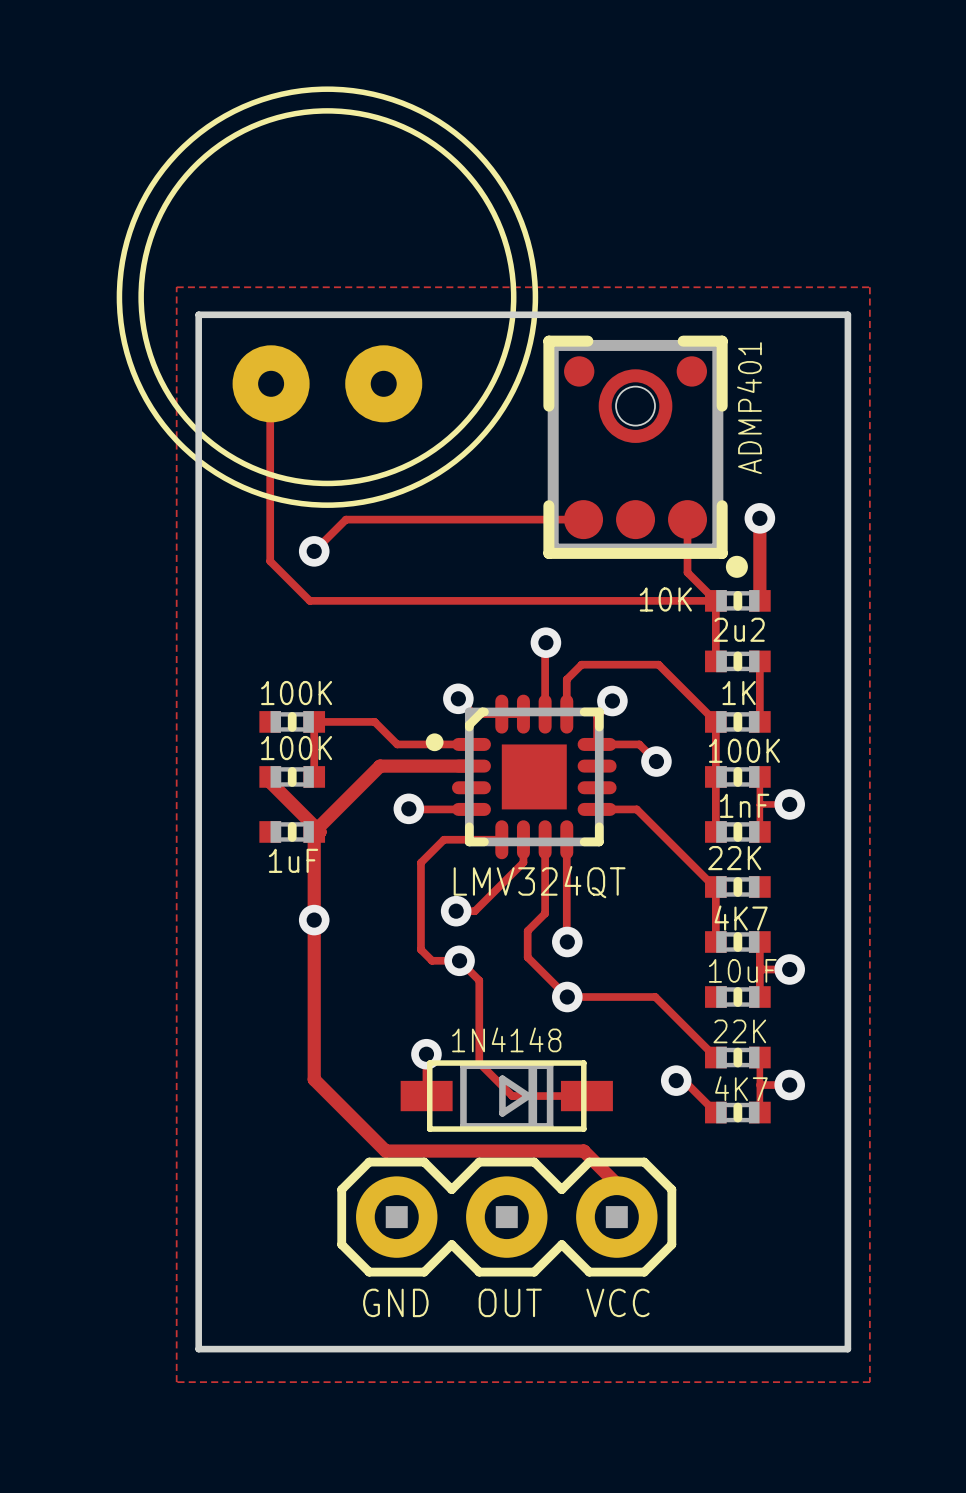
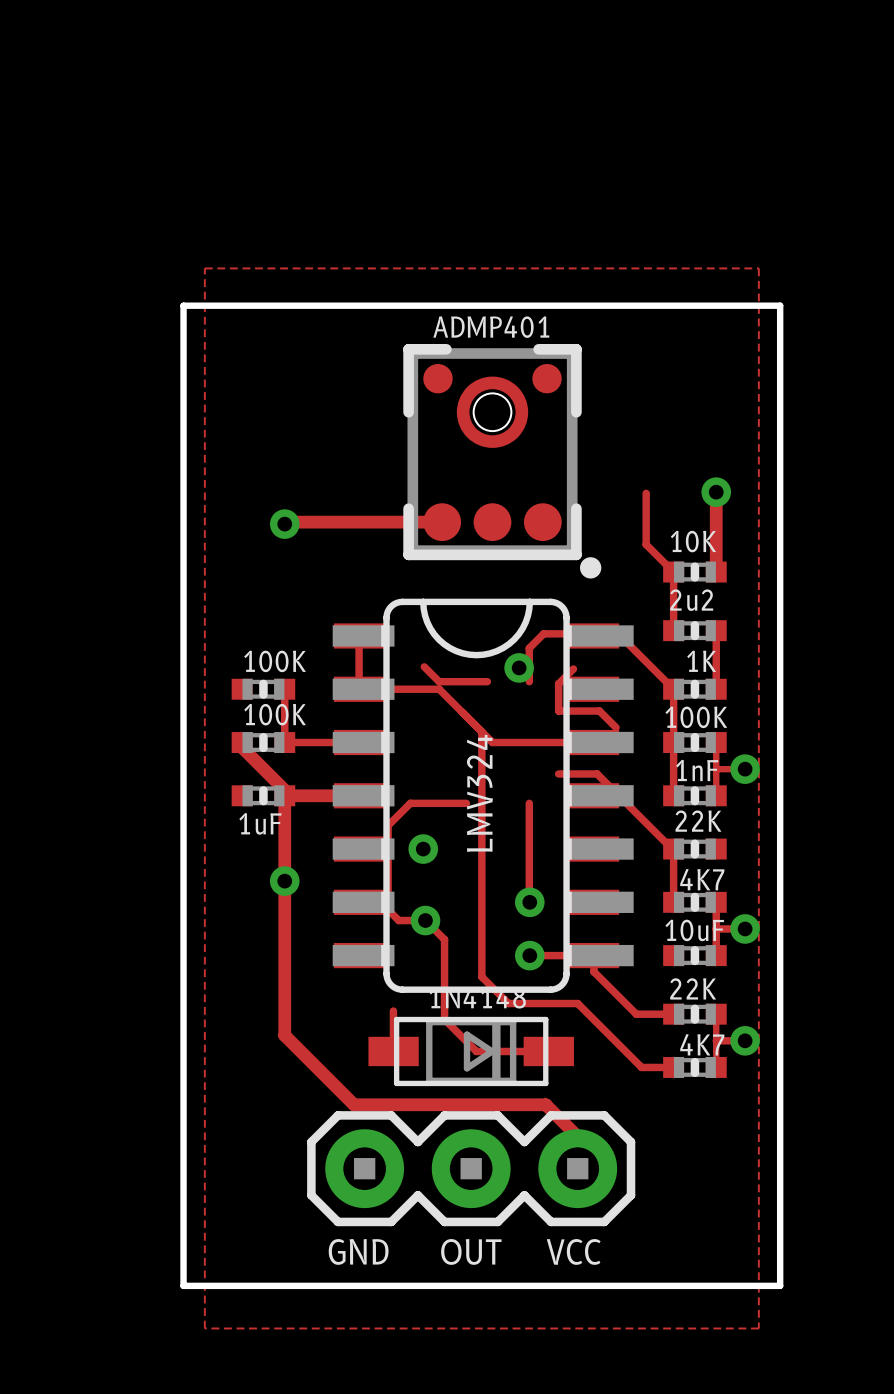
zone outline: (231, 287) (176, 287) (176, 1382) (231, 1382) -> (204, 268) (204, 1328)
zone outline: (803, 287) (869, 287) (869, 1382) (803, 1382) -> (758, 268) (758, 1328)
part: (327, 297) -> none
board edge: (198, 314) (198, 1349) (847, 1349) (847, 314) (198, 314) -> (183, 305) (183, 1285) (780, 1285) (780, 305) (183, 305)
track: (271, 383) (270, 561) (309, 600) (715, 600) -> none
part value rotation: 0° (749, 408) -> 90° clockwise (491, 327)
part position: (645, 456) -> (502, 461)
track: (583, 519) (345, 519) (316, 549) -> (442, 522) (286, 522)
part value position: 10K (665, 599) -> 10K (693, 541)
track: (545, 642) (545, 714) -> none
via: (545, 642) -> none
track: none -> (359, 635) (359, 689) (439, 689) (492, 742) (593, 742)
via: (458, 698) -> none
via: none -> (519, 667)
via: (612, 701) -> none
track: (314, 721) (374, 721) (397, 744) (471, 744) -> none
via: (656, 761) -> none
track: (471, 766) (380, 766) (314, 831) -> none
track: none -> (284, 742) (359, 742)
part: LMV324QT (521, 776) -> none
via: (408, 808) -> none
track: (409, 809) (471, 809) -> none
text: none -> LMV324 (479, 793)
track: none -> (290, 795) (359, 795)
part: none -> (483, 795)
track: (523, 839) (523, 862) (474, 911) (456, 911) -> none
track: (545, 839) (545, 913) (527, 930) (527, 957) (567, 997) -> none
via position: (456, 911) -> (423, 849)
track: (633, 997) (655, 997) (715, 1057) -> (593, 955) (593, 971) (636, 1014) (673, 1014)
via: (426, 1054) -> none
track: (676, 1080) (683, 1080) (715, 1112) -> (481, 731) (481, 976) (508, 1003) (577, 1003) (641, 1067) (673, 1067)
via: (676, 1080) -> none

